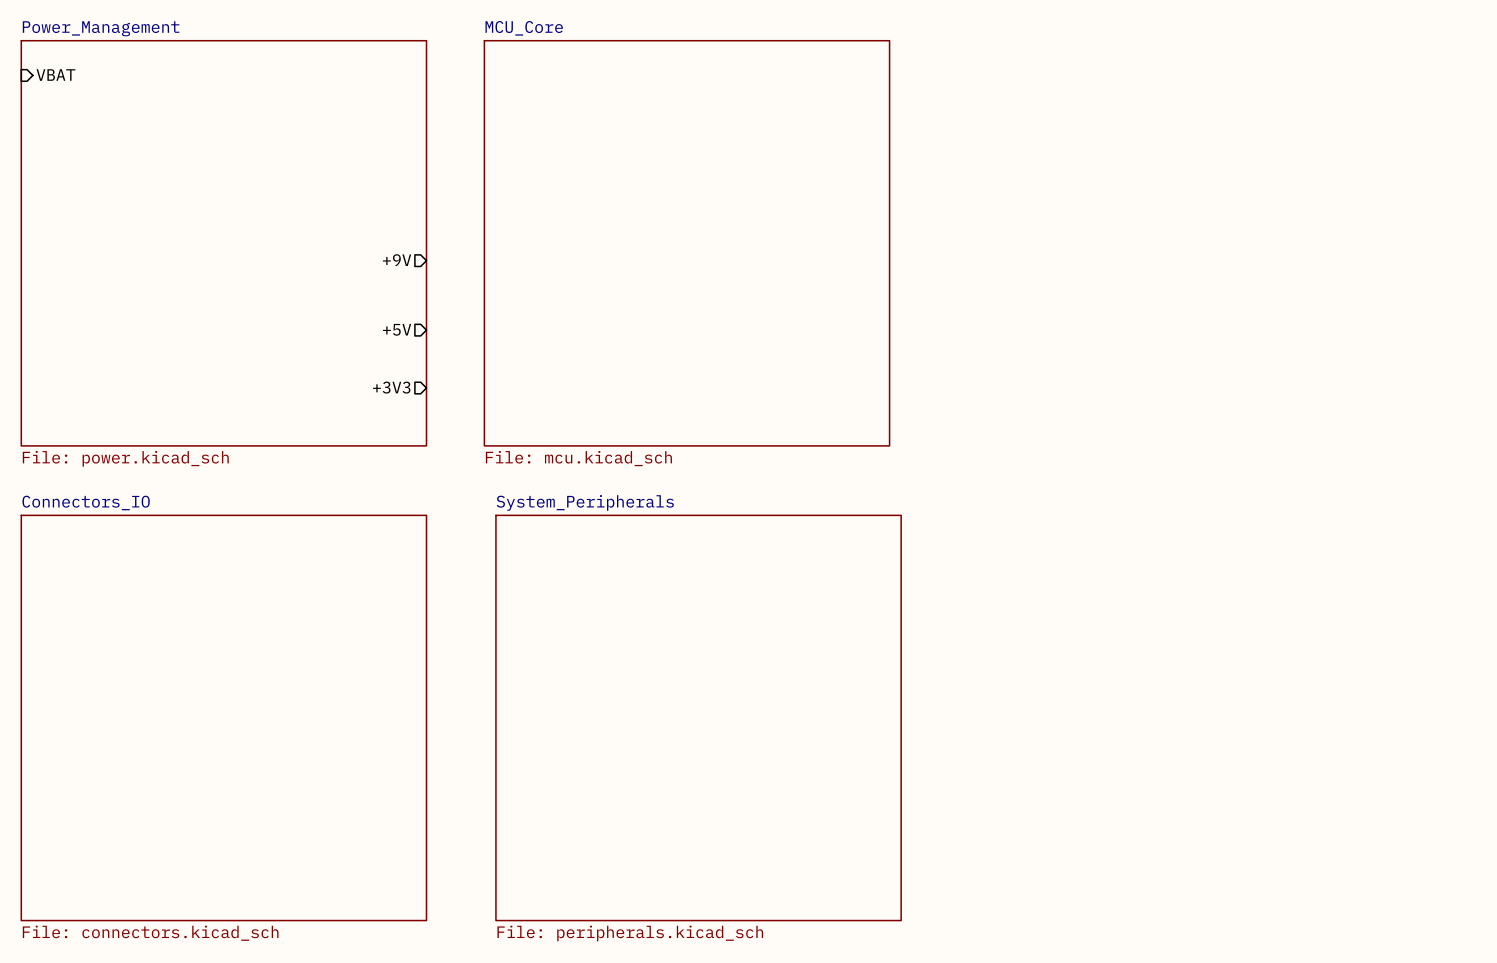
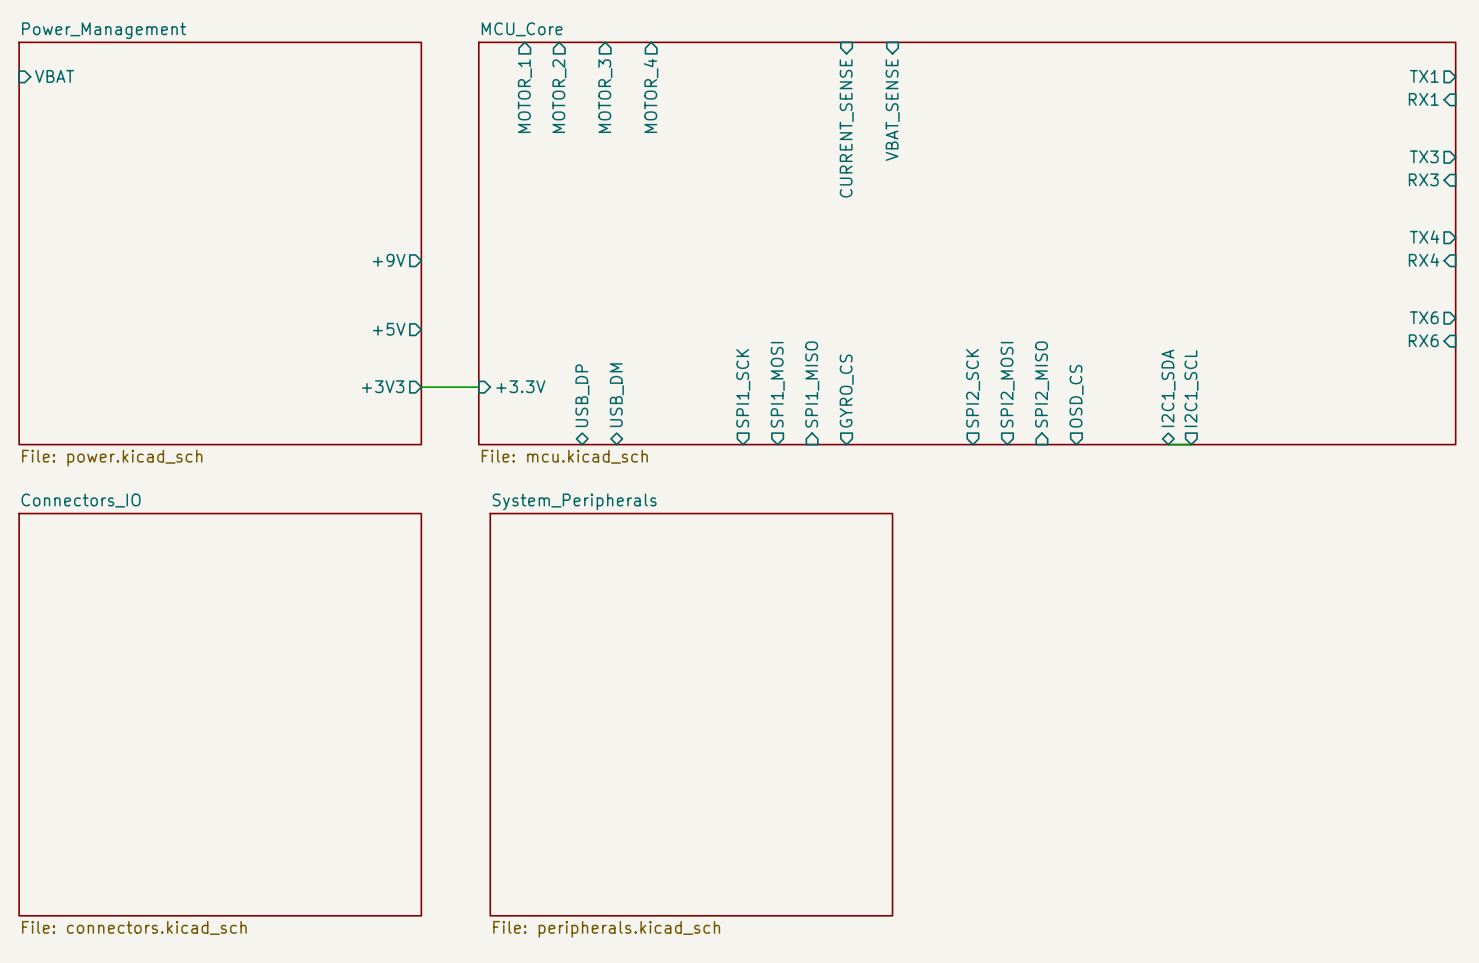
sheet pin: none -> TX1 (1424, 76)
sheet pin: none -> MOTOR_1 (524, 96)
sheet pin: none -> MOTOR_2 (559, 96)
sheet pin: none -> MOTOR_3 (605, 96)
sheet pin: none -> MOTOR_4 (651, 95)
sheet pin: none -> RX1 (1423, 99)
sheet pin: none -> VBAT_SENSE (892, 110)
sheet pin: none -> CURRENT_SENSE (846, 128)
sheet pin: none -> TX3 (1424, 156)
sheet pin: none -> RX3 (1423, 179)
sheet pin: none -> TX4 (1424, 237)
sheet MCU_Core: File: mcu.kicad_sch (686, 243) -> none
sheet MCU_Core: none -> File: mcu.kicad_sch (967, 243)
sheet pin: none -> RX4 (1424, 260)
sheet pin: none -> TX6 (1424, 317)
sheet pin: none -> RX6 (1423, 340)
sheet pin: none -> SPI1_MOSI (777, 384)
sheet pin: none -> SPI1_MISO (812, 384)
sheet pin: none -> SPI2_MOSI (1007, 384)
sheet pin: none -> SPI2_MISO (1042, 384)
sheet pin: none -> +3.3V (520, 386)
wire: none -> (421, 387) (478, 387)
sheet pin: none -> I2C1_SDA (1168, 388)
sheet pin: none -> SPI1_SCK (743, 388)
sheet pin: none -> SPI2_SCK (973, 388)
sheet pin: none -> I2C1_SCL (1191, 388)
sheet pin: none -> GYRO_CS (846, 391)
sheet pin: none -> USB_DP (582, 395)
sheet pin: none -> USB_DM (616, 395)
sheet pin: none -> OSD_CS (1076, 396)
wire: none -> (1168, 444) (1191, 444)

